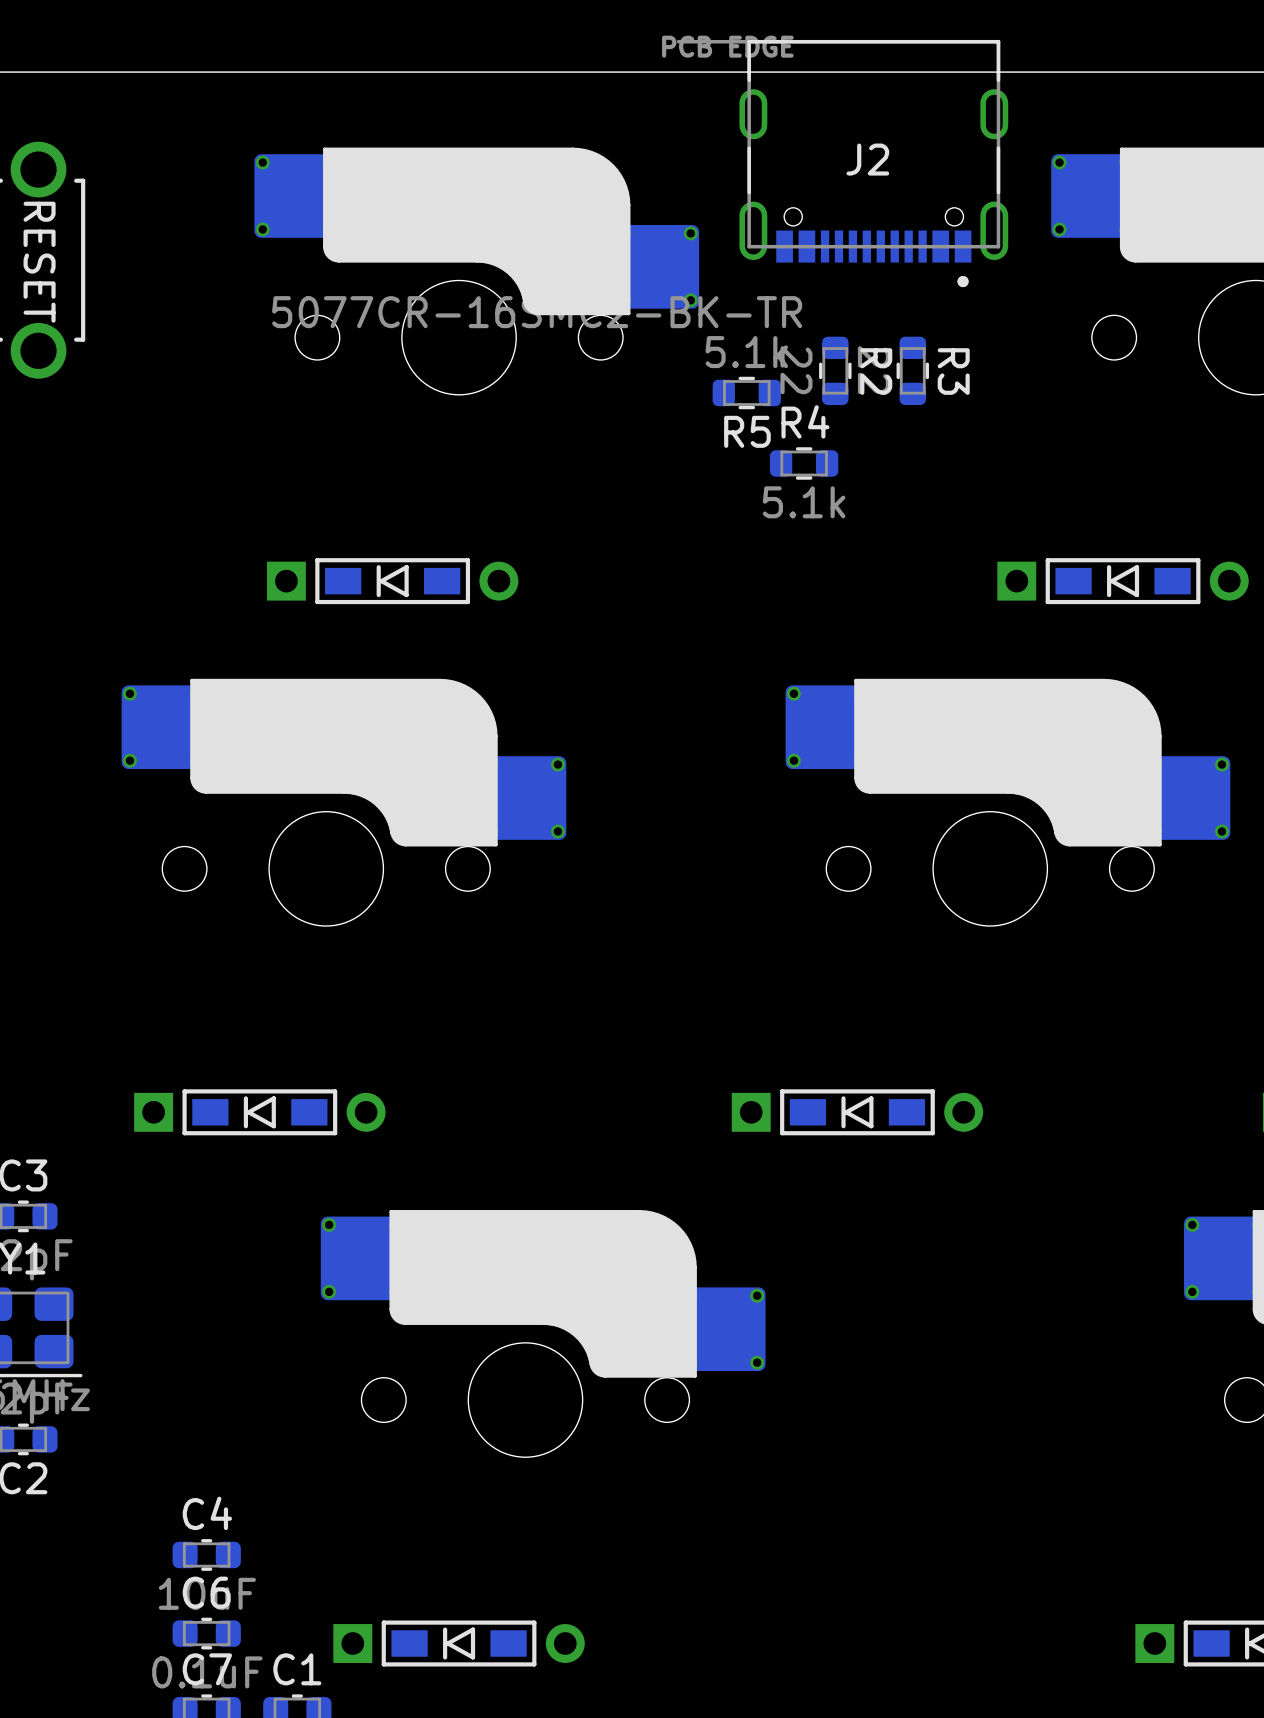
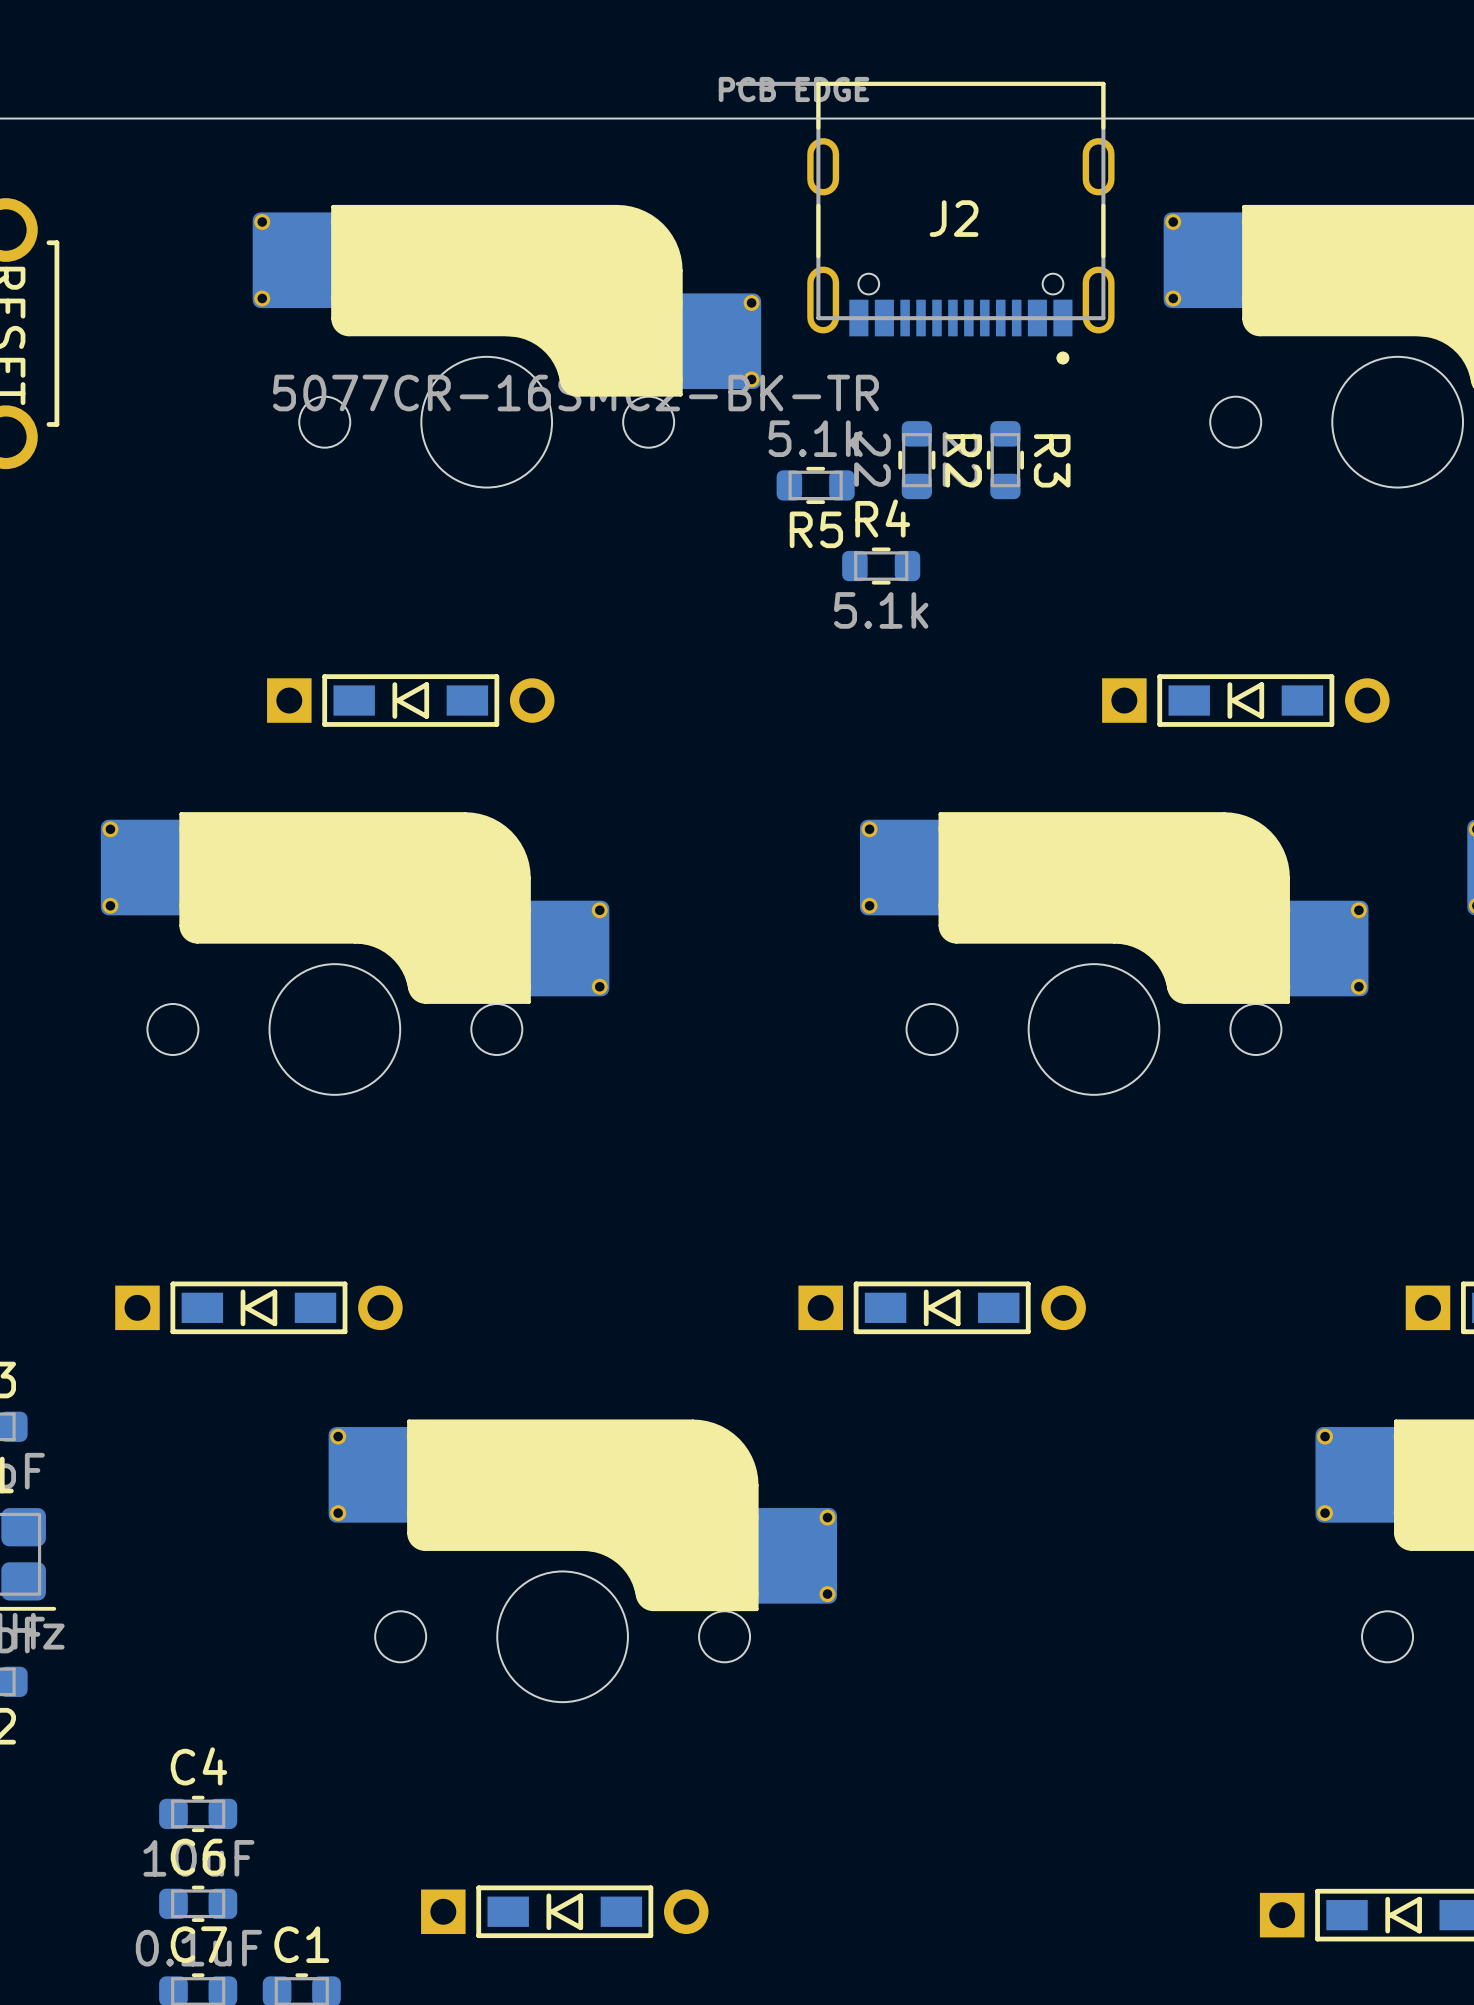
part position: (459, 1643) -> (564, 1911)

